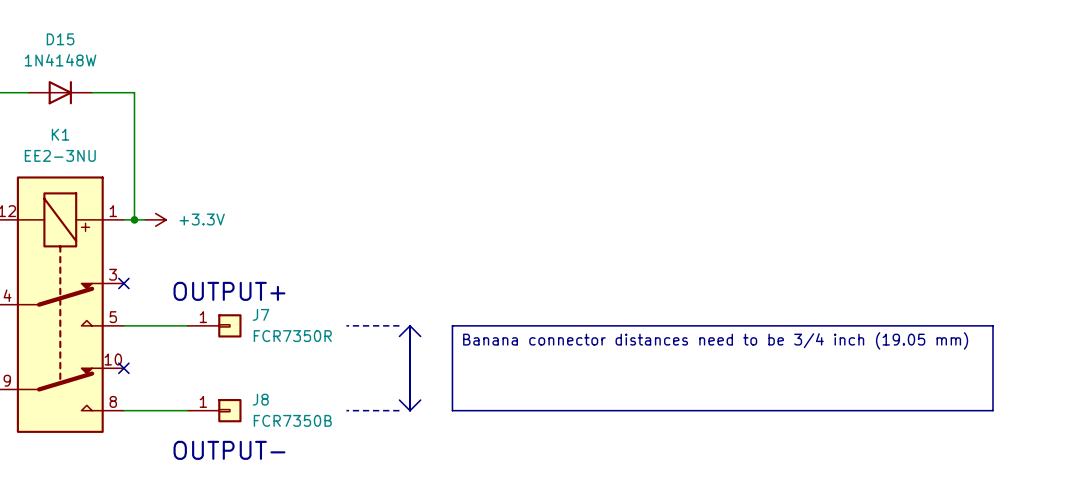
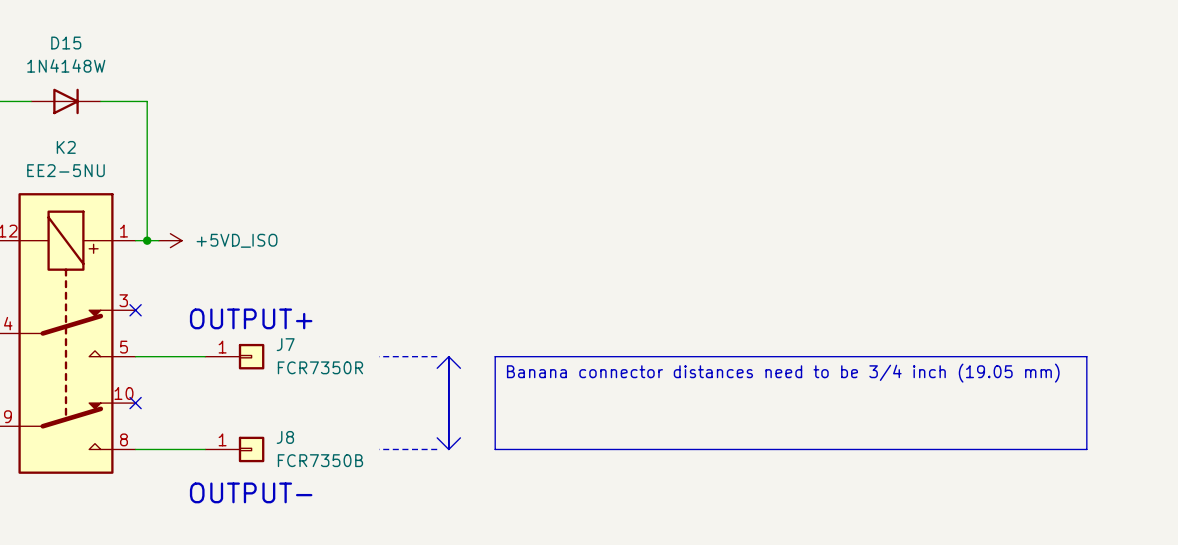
K1 name: K1 (60, 134) -> K2 (66, 147)
K1 value: EE2-3NU (60, 155) -> EE2-5NU (65, 170)
power symbol: +3.3V (155, 219) -> +5VD_ISO (170, 240)

